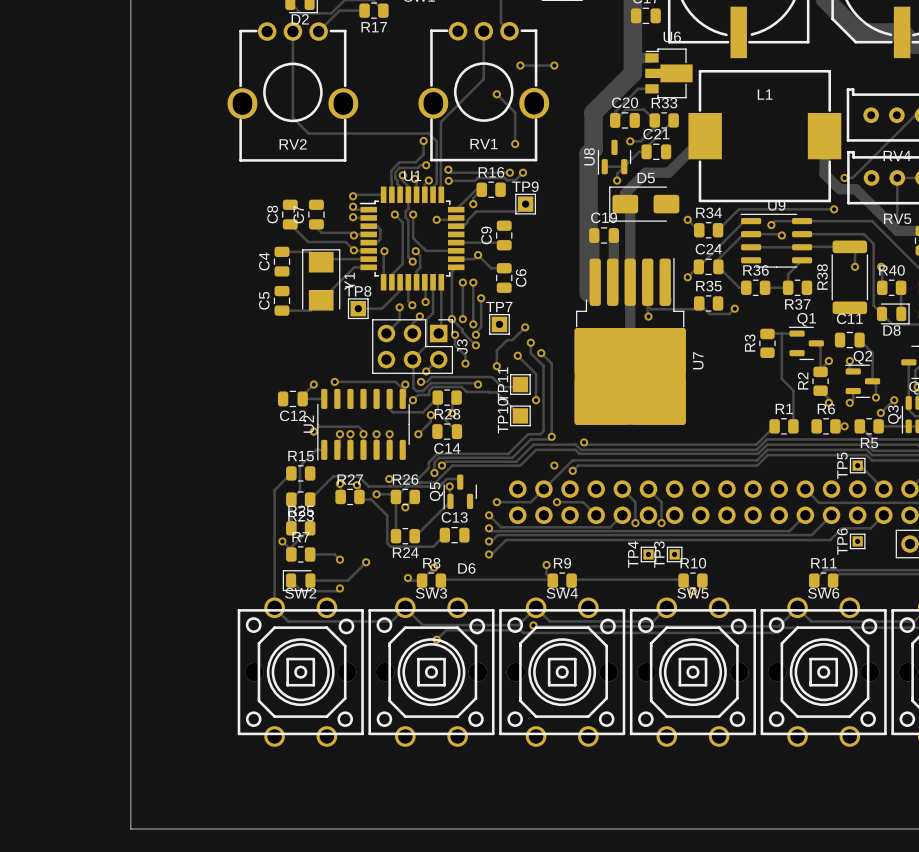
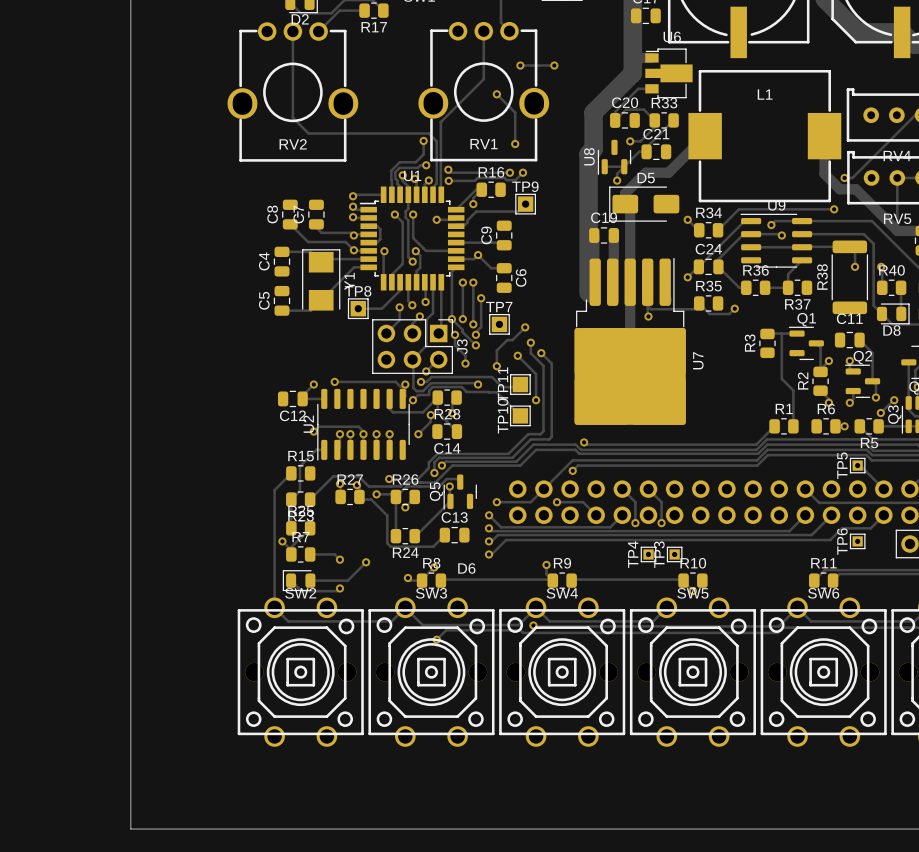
via: (551, 436) -> none
via: (554, 465) -> none

